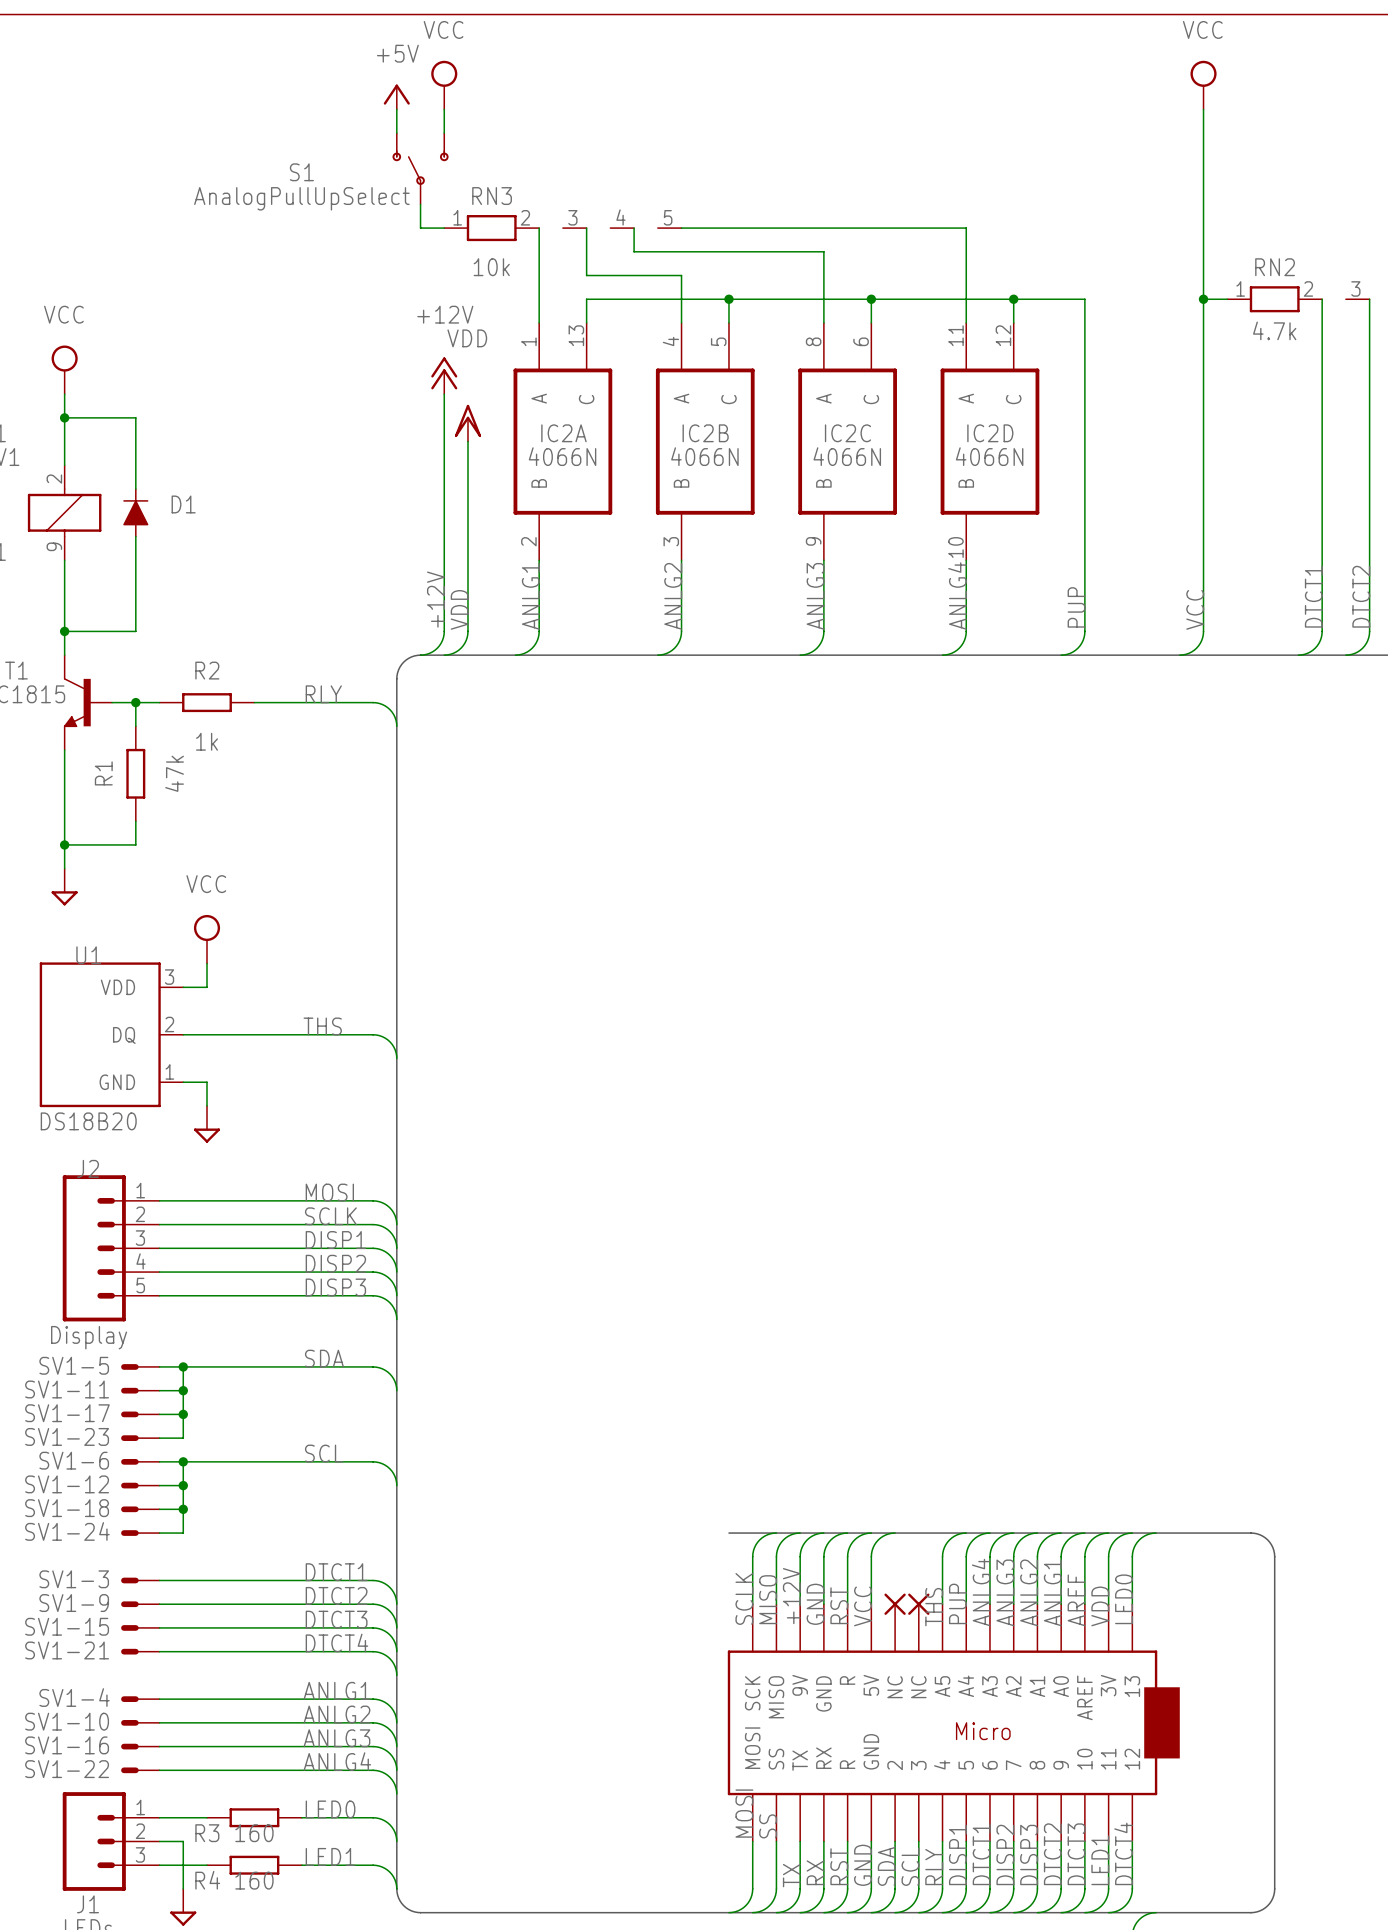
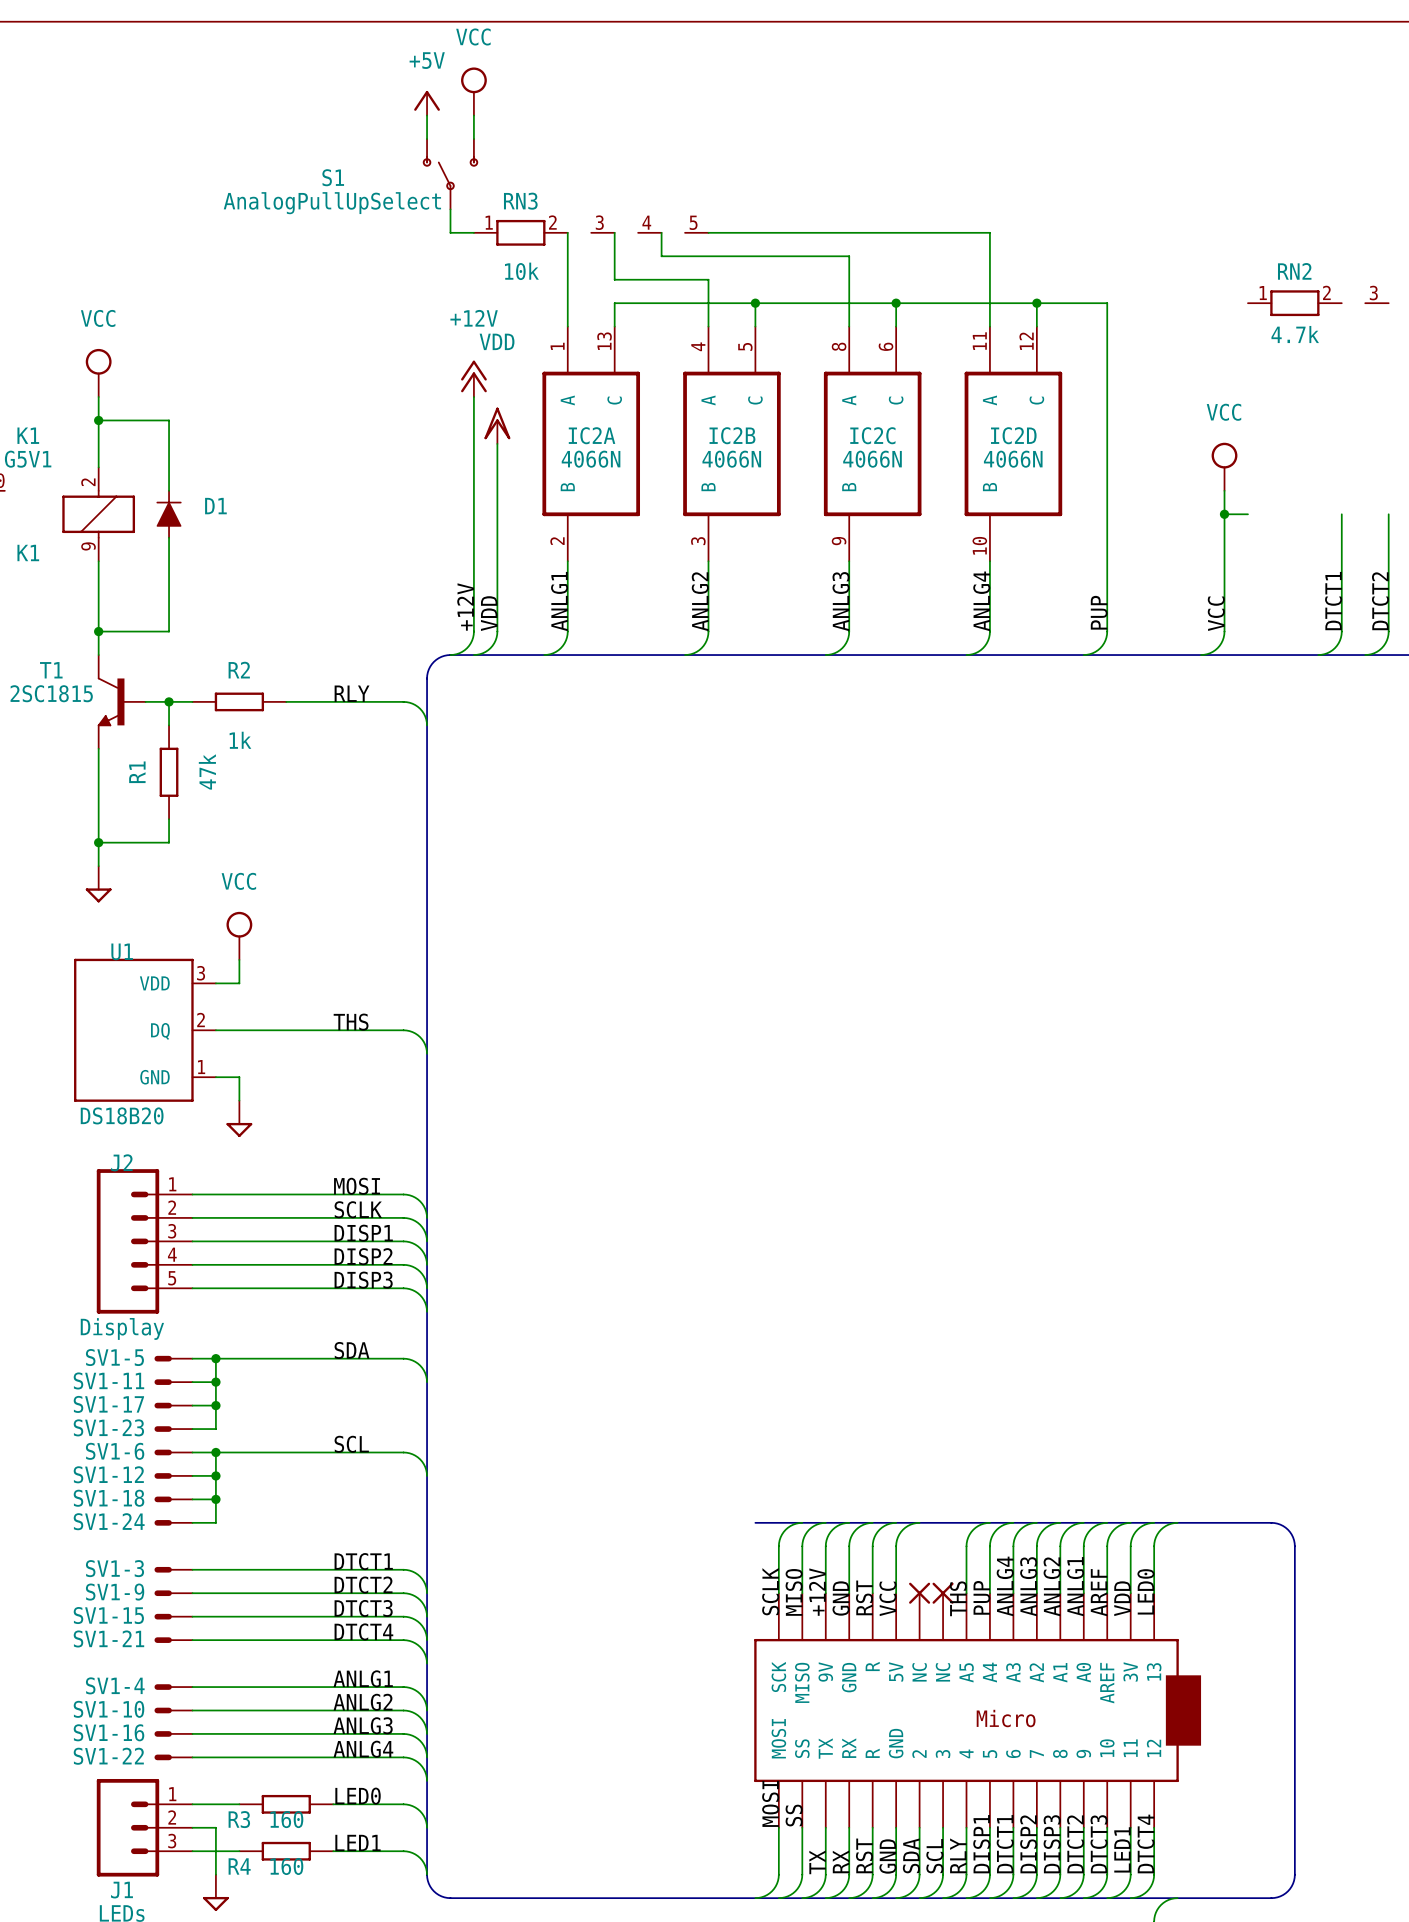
power symbol: VCC (1203, 85) -> none
wire: (1203, 109) (1203, 489) -> none
wire: (1203, 299) (1227, 299) -> (1224, 514) (1247, 514)
junction: (1203, 299) -> none
wire: (1322, 299) (1322, 512) -> none
wire: (1369, 299) (1369, 512) -> none
power symbol: none -> VCC (1224, 466)
junction: none -> (1224, 514)

